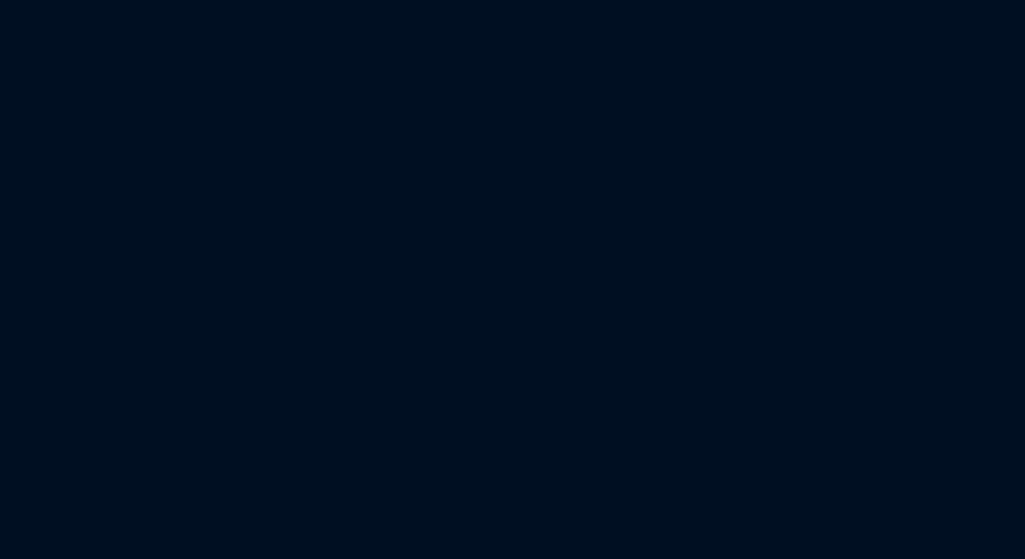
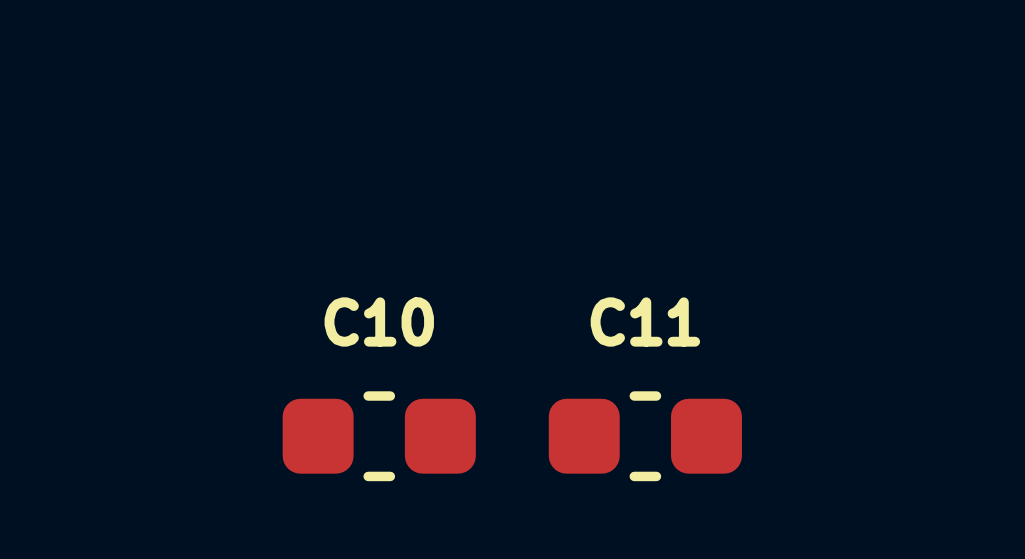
C10: none -> (379, 436)
C11: none -> (645, 436)

